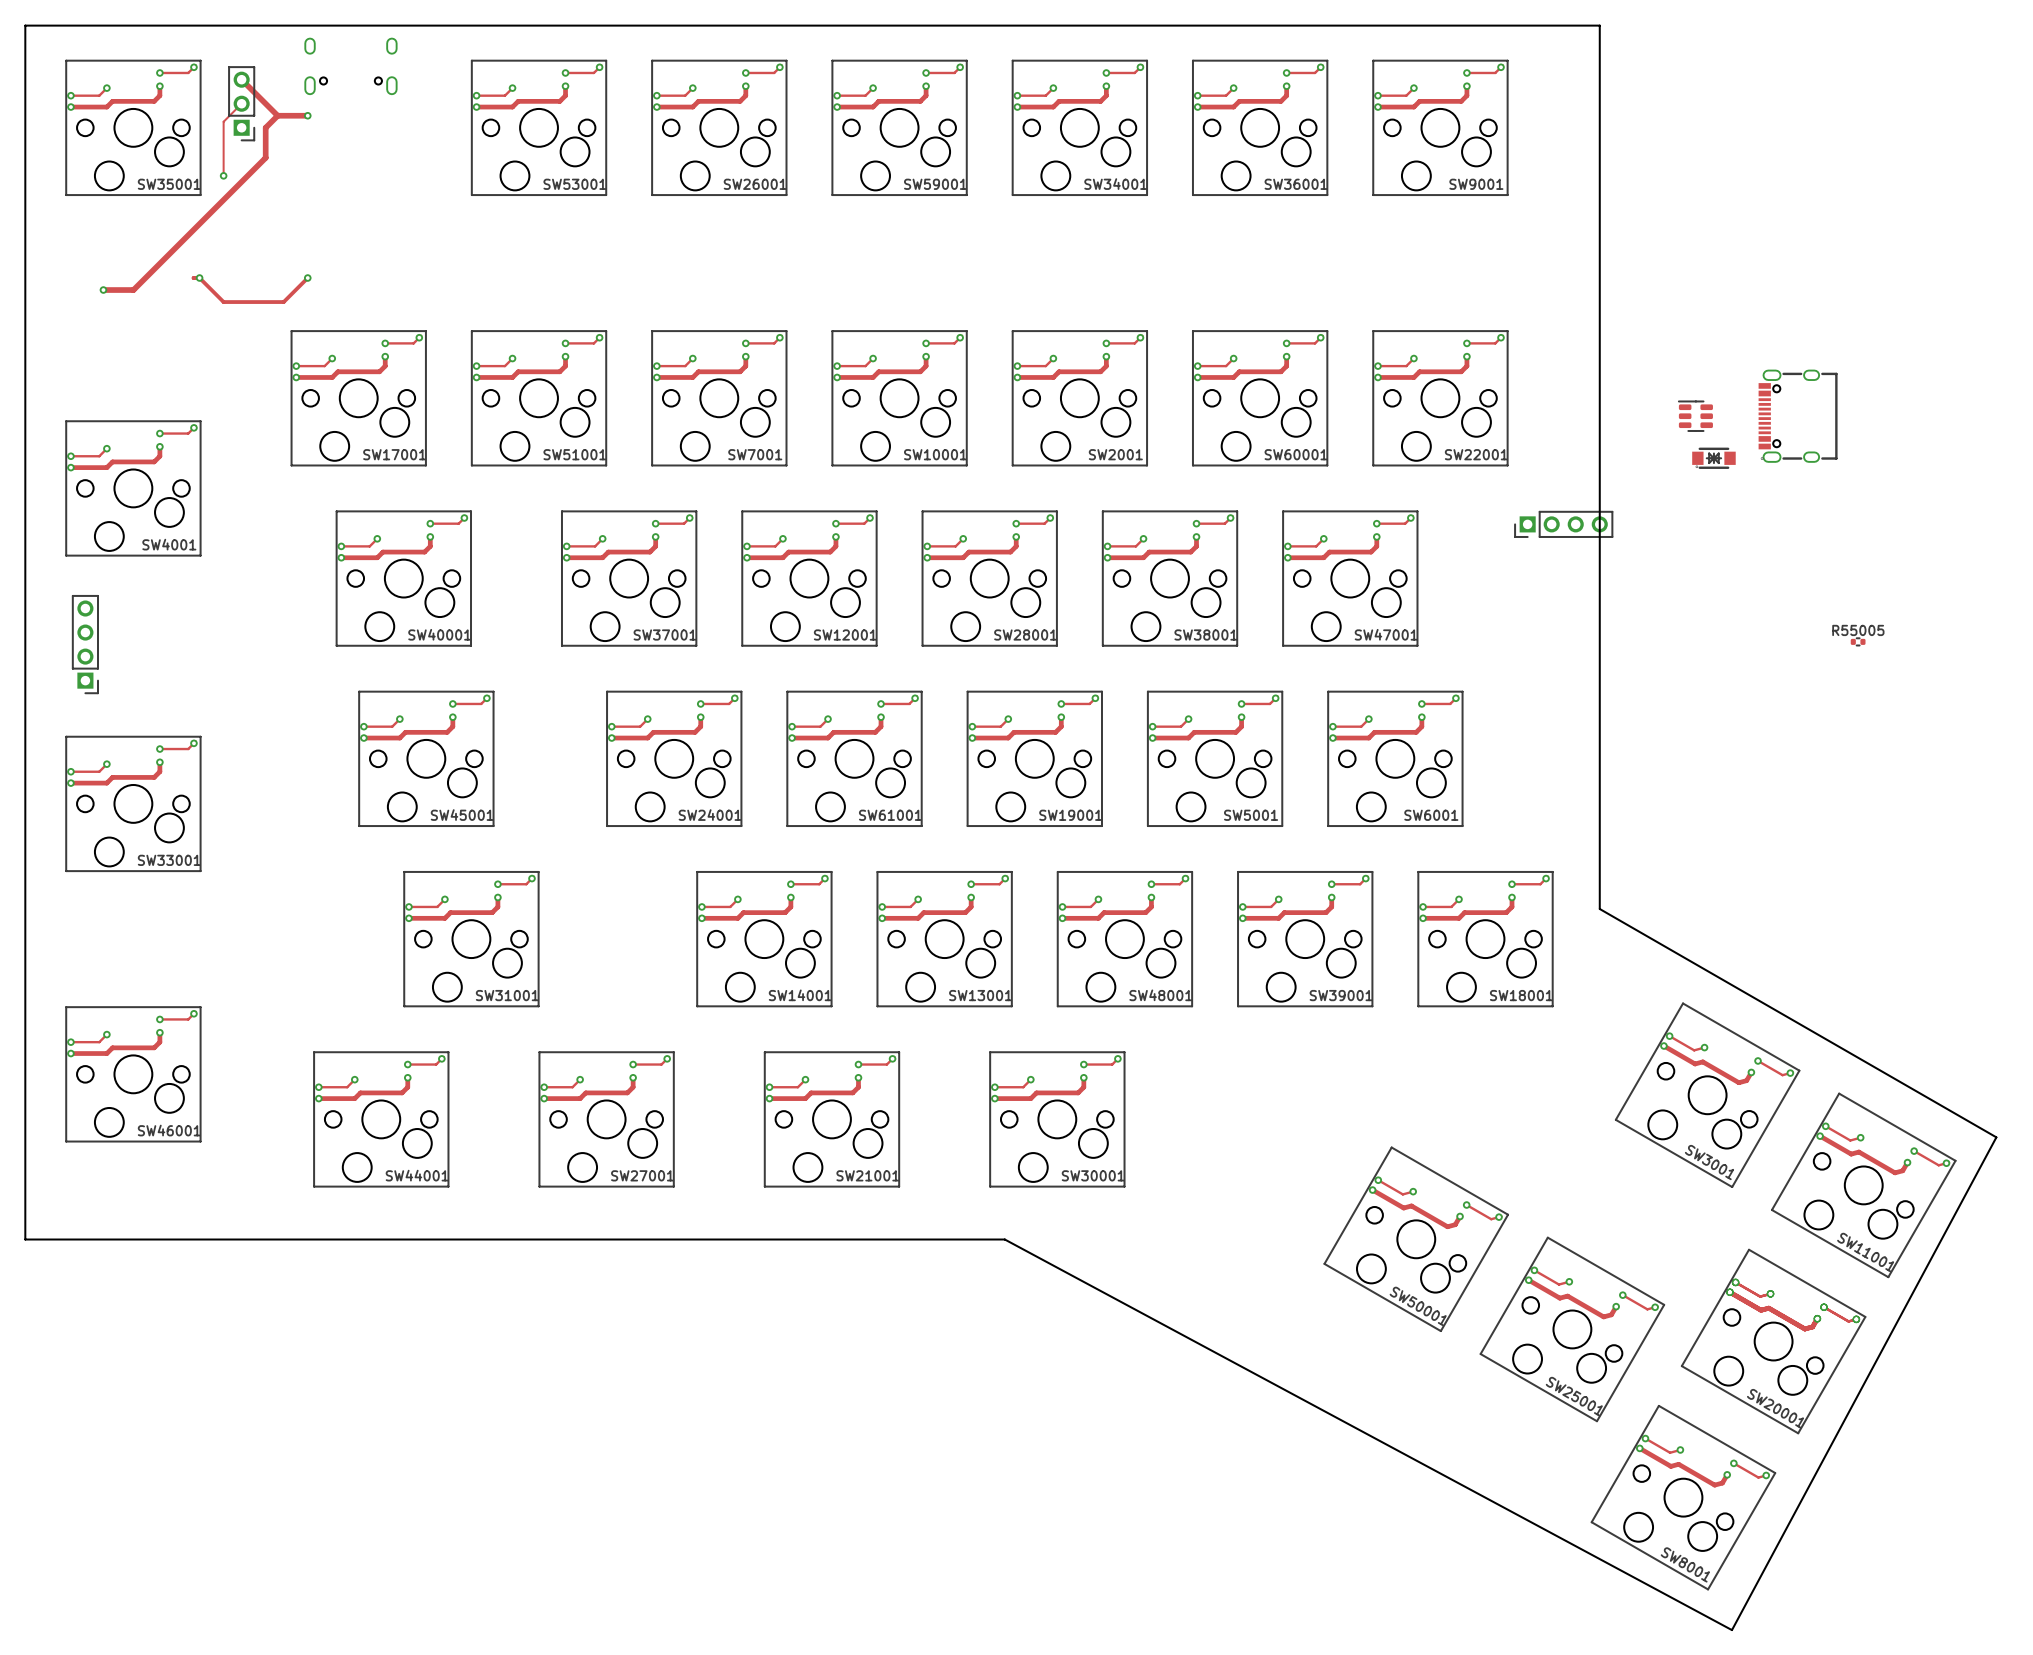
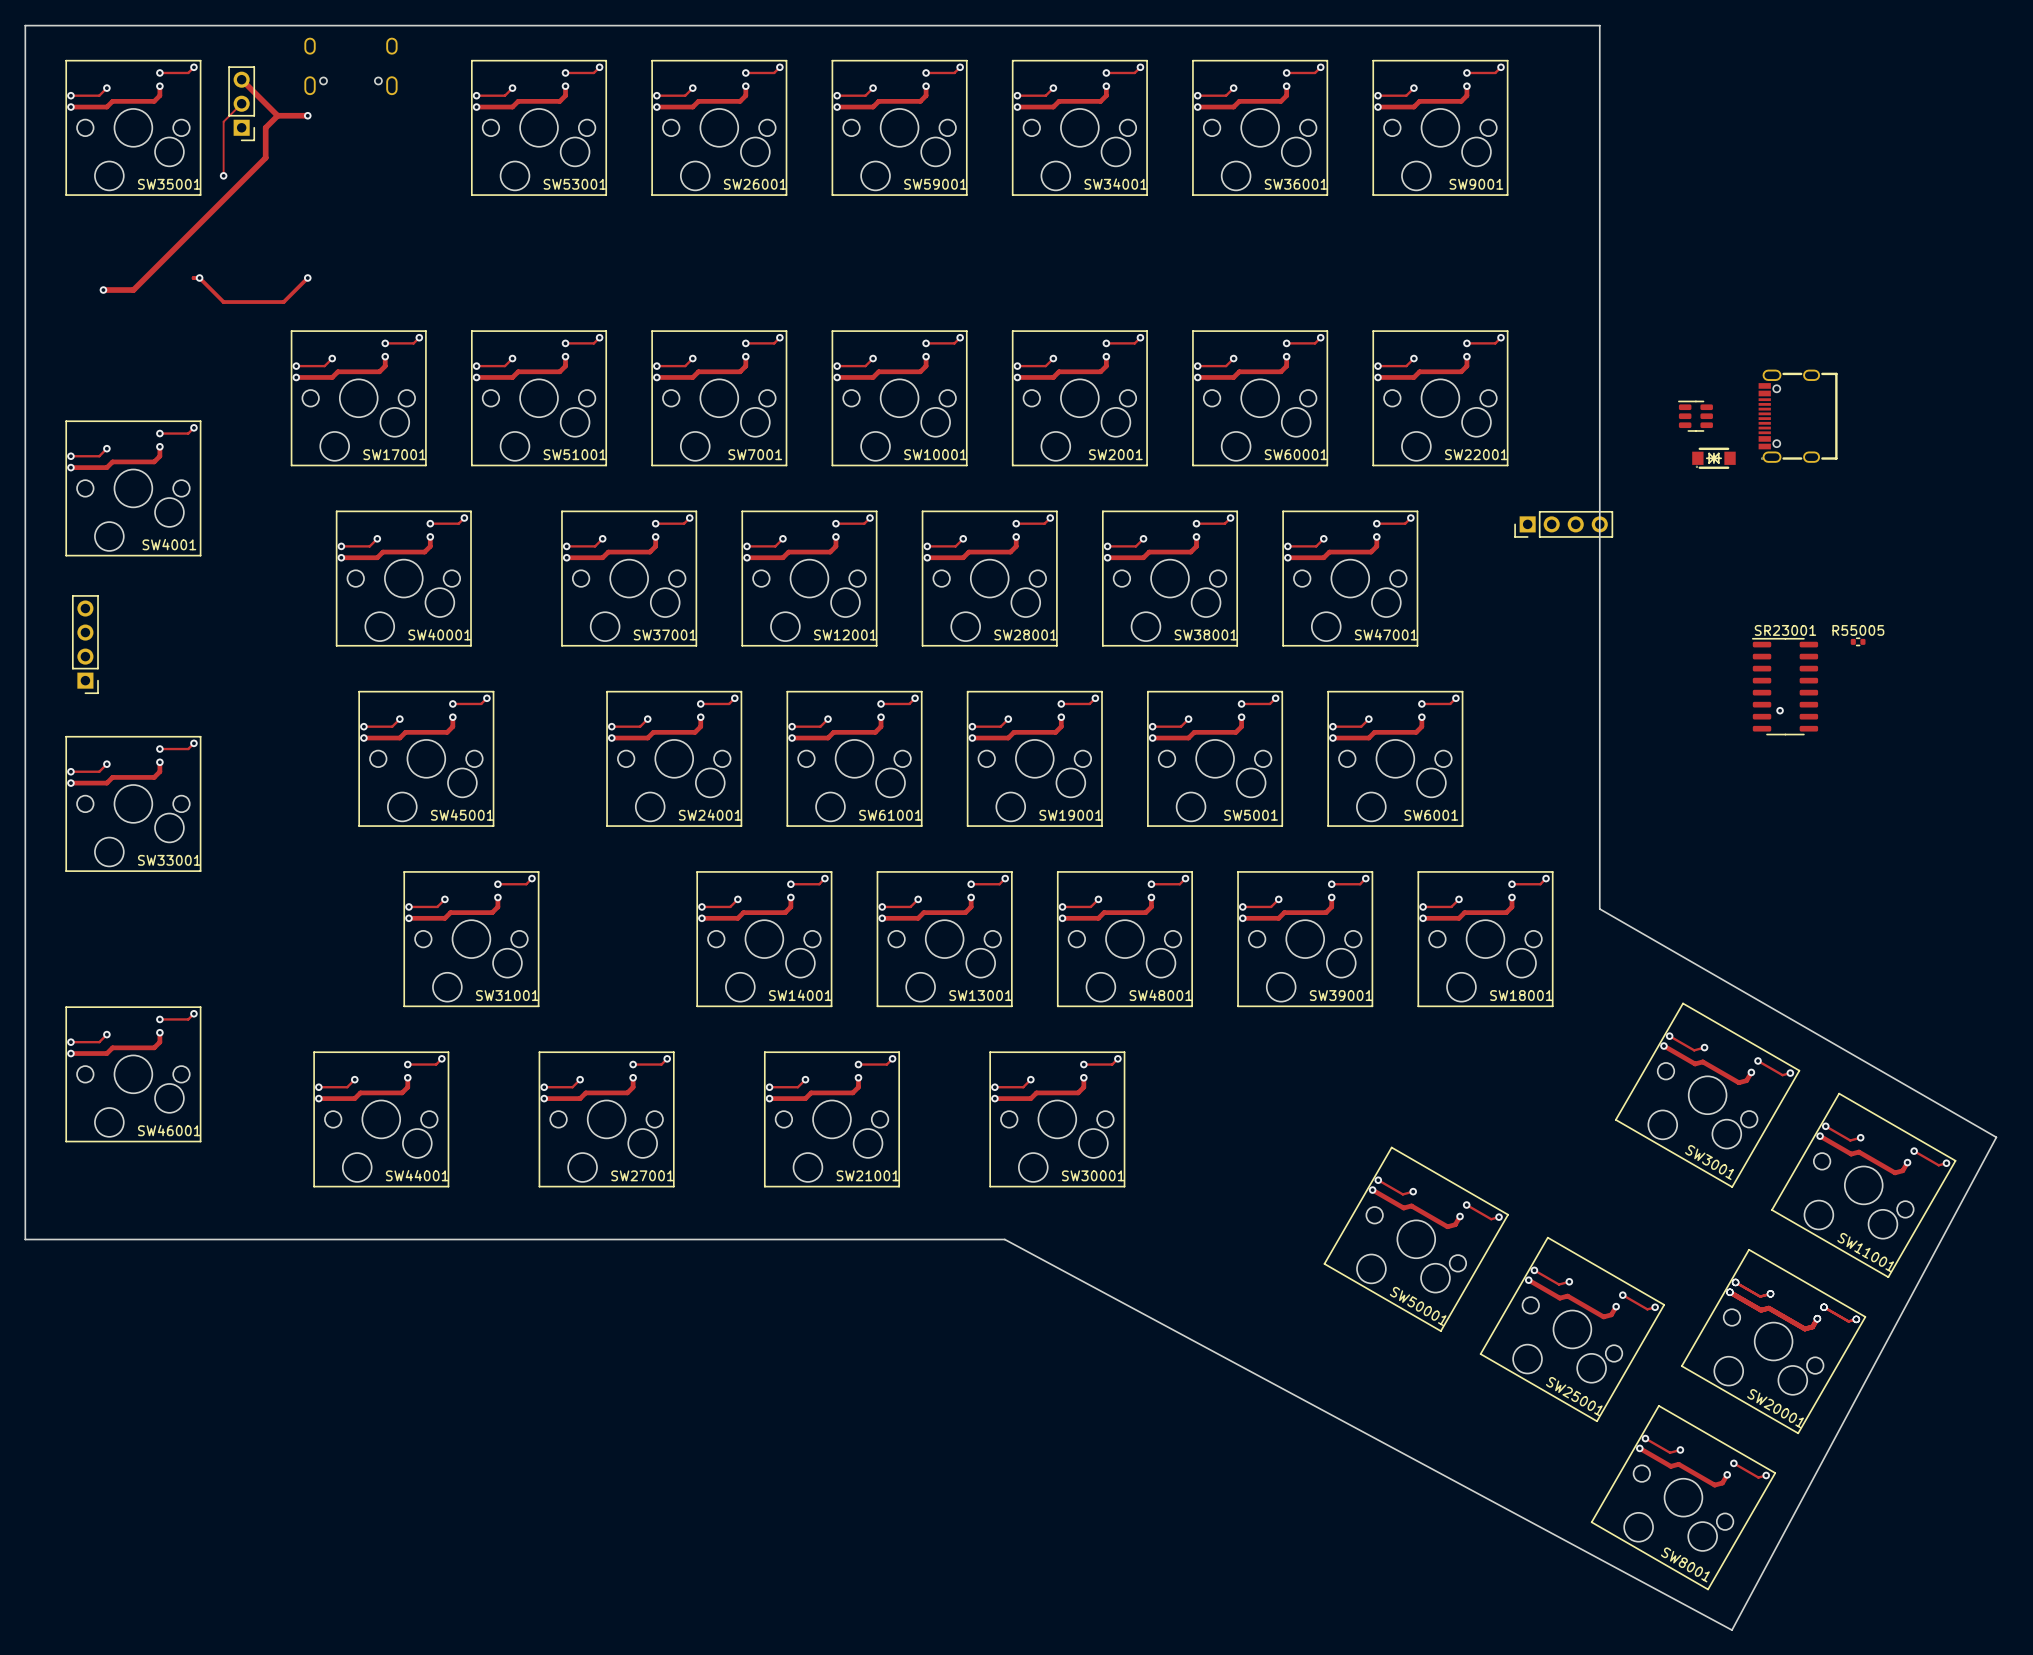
SR23001: none -> (1785, 686)
via: none -> (1780, 710)

